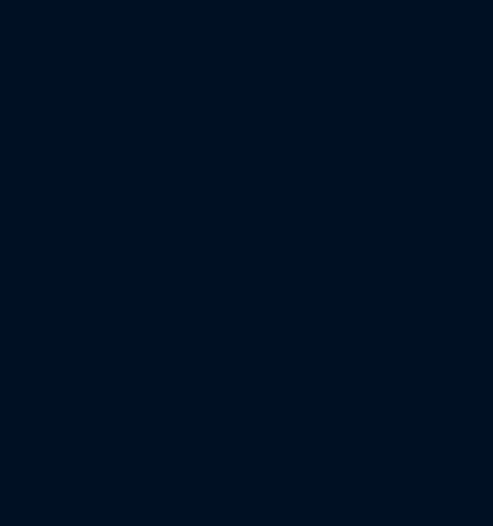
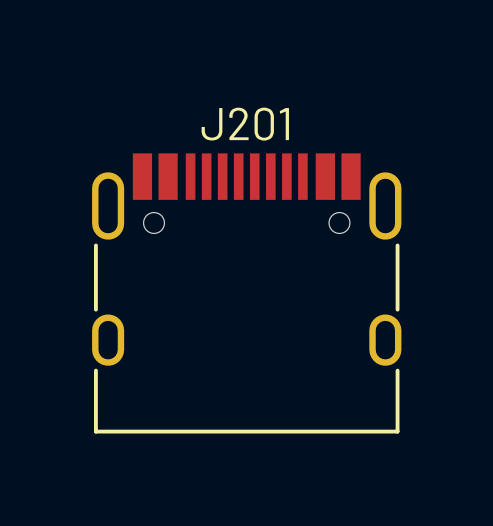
J201: none -> (246, 293)

